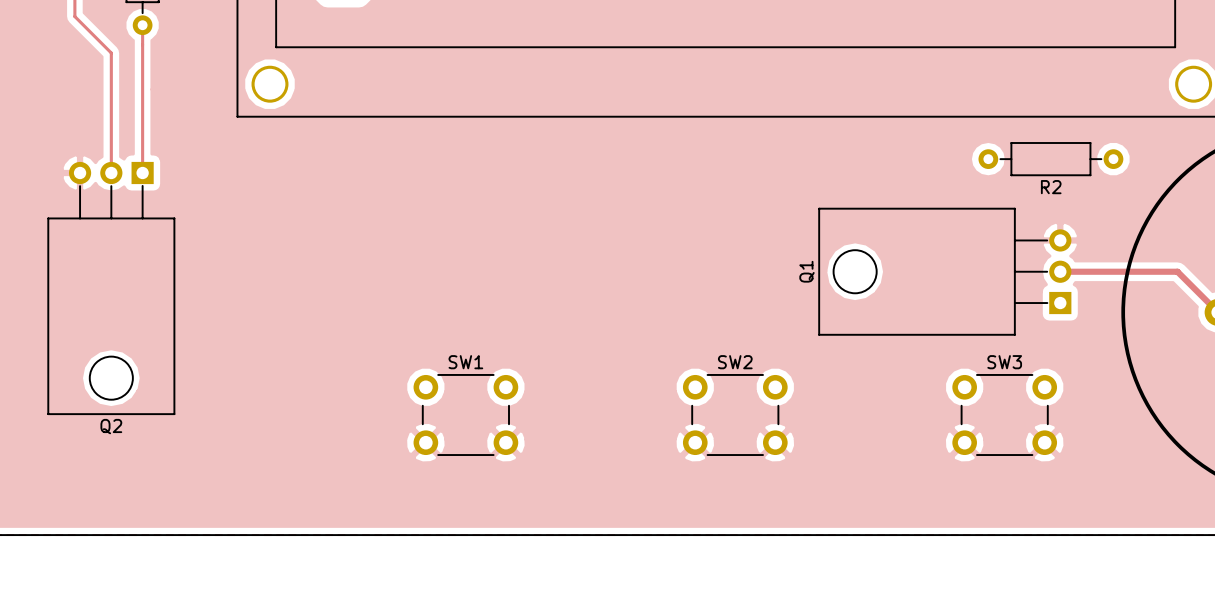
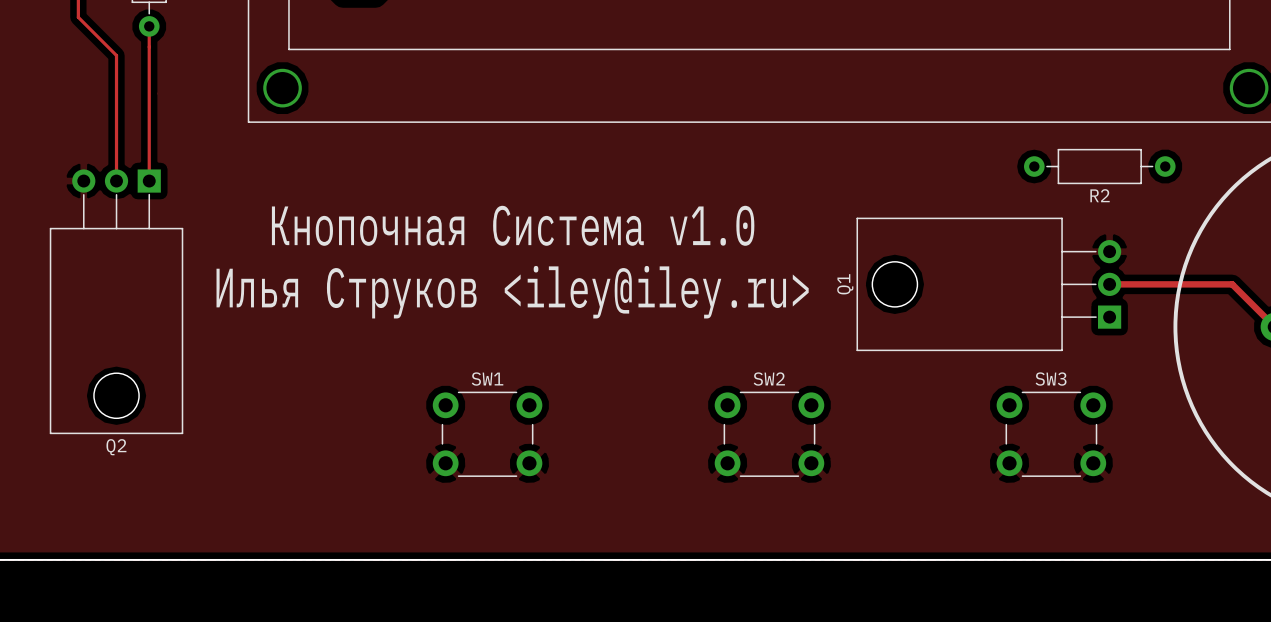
text: none -> Кнопочная Система v1.0 (513, 225)
text: none -> Илья Струков <iley@iley.ru> (512, 292)

